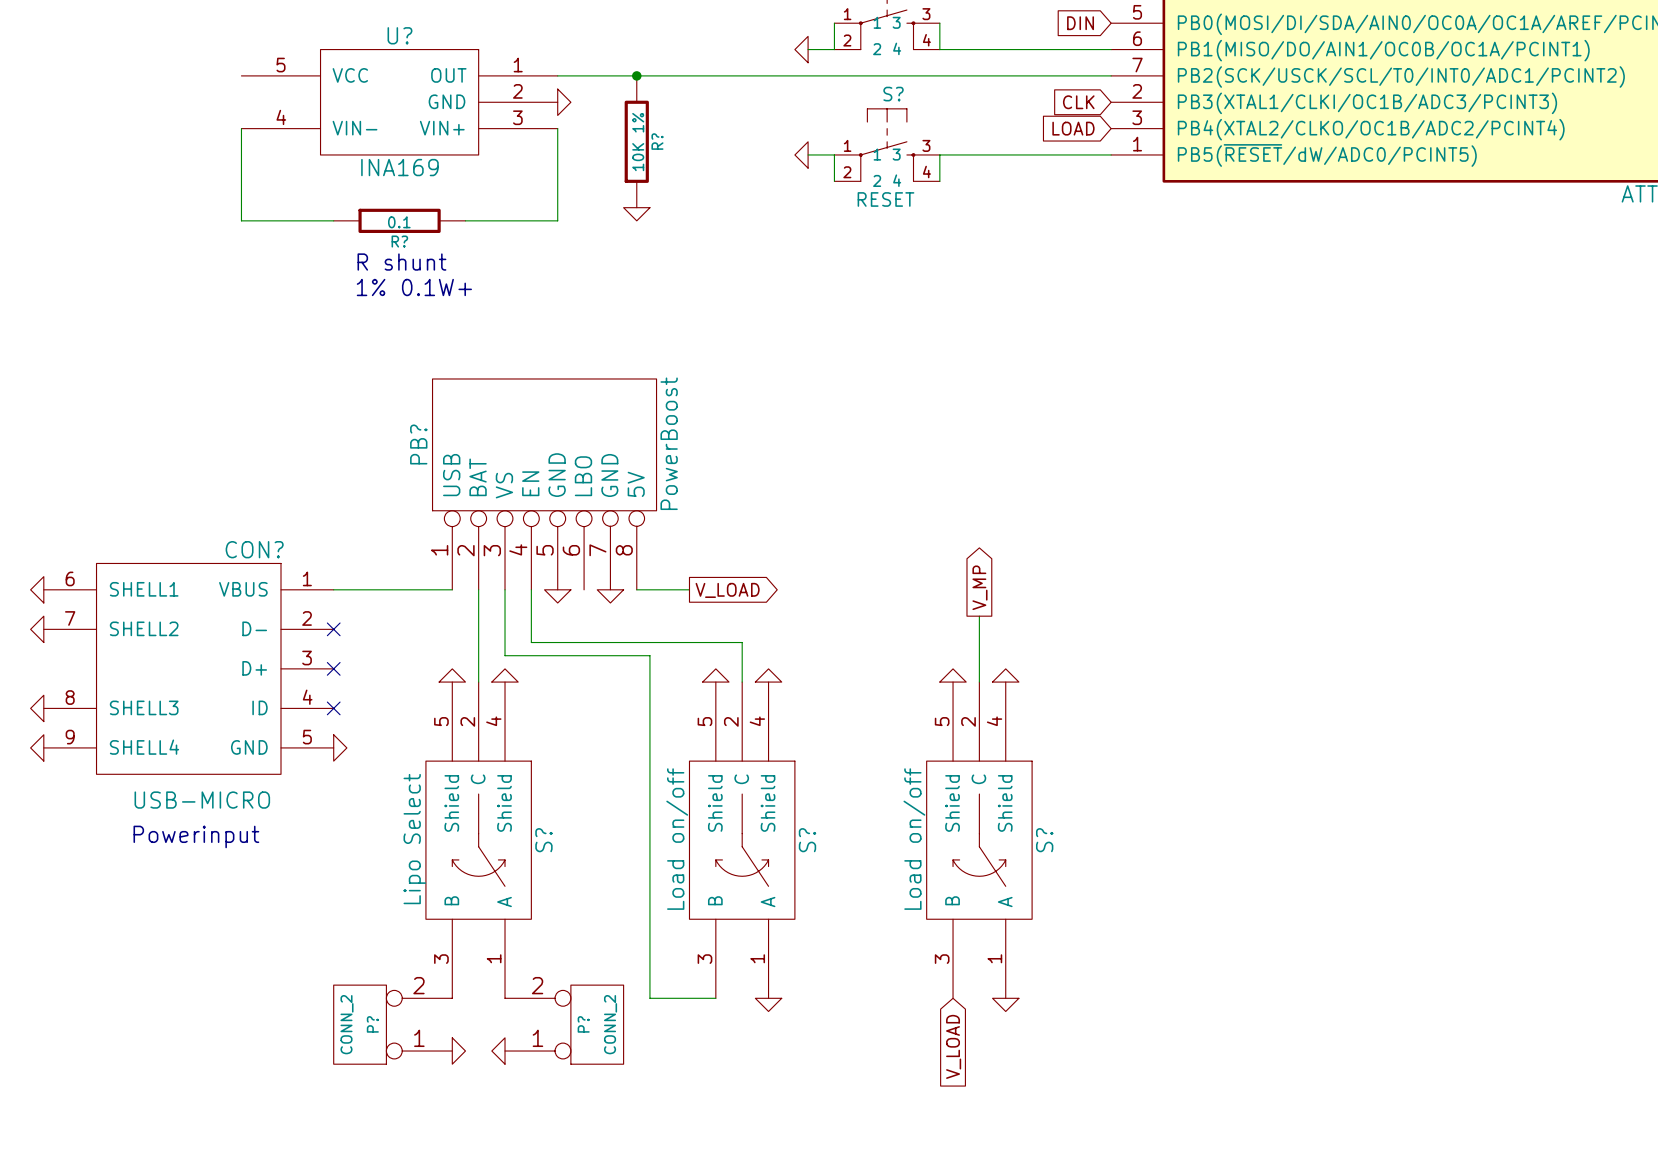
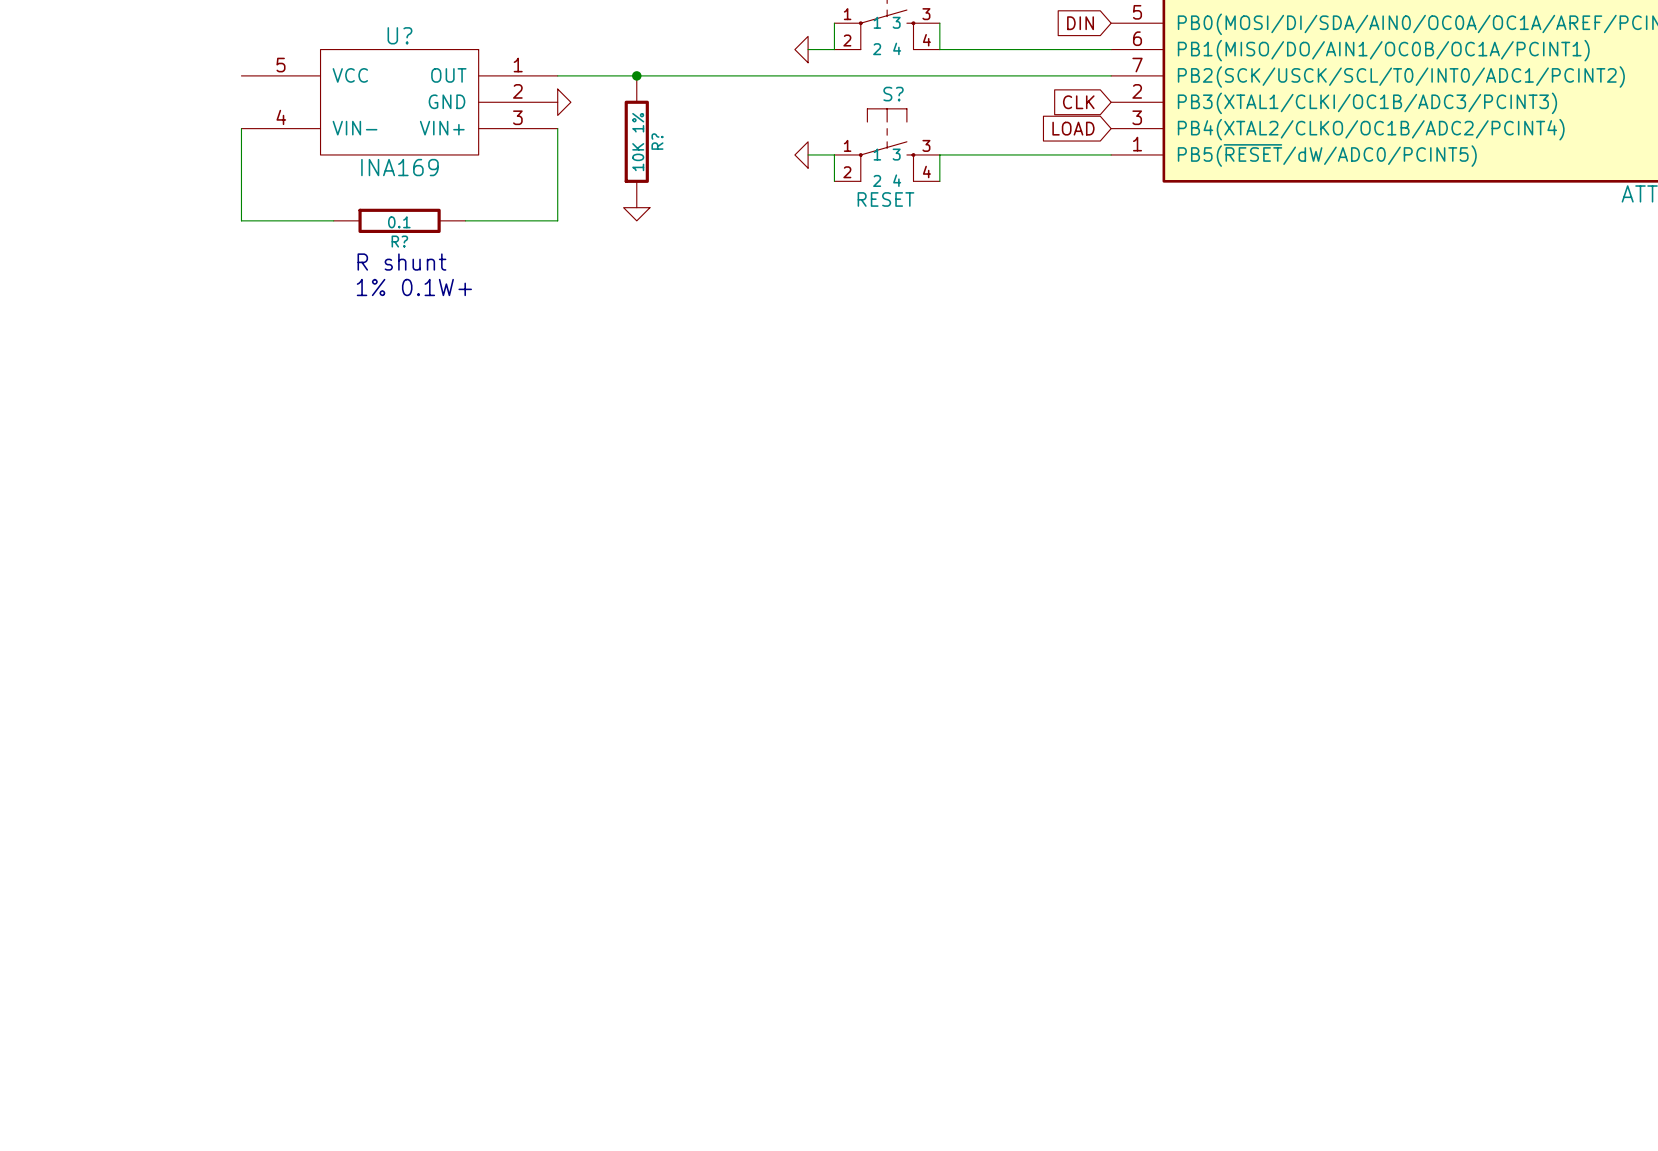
PB?: PowerBoost (544, 484) -> none
global label: V_MP (979, 587) -> none
power symbol: (37, 589) -> none
wire: (333, 589) (452, 589) -> none
wire: (478, 589) (478, 682) -> none
wire: (505, 589) (505, 655) (649, 655) (649, 998) (715, 998) -> none
wire: (531, 589) (531, 642) (742, 642) (742, 682) -> none
wire: (636, 589) (689, 589) -> none
global label: V_LOAD (727, 590) -> none
power symbol: (557, 596) -> none
power symbol: (610, 596) -> none
wire: (979, 616) (979, 682) -> none
power symbol: (37, 629) -> none
no-connect mark: (333, 629) -> none
CON?: USB-MICRO (188, 668) -> none
no-connect mark: (333, 668) -> none
power symbol: (452, 675) -> none
power symbol: (505, 675) -> none
power symbol: (715, 675) -> none
power symbol: (768, 675) -> none
power symbol: (953, 675) -> none
power symbol: (1005, 675) -> none
power symbol: (37, 708) -> none
no-connect mark: (333, 708) -> none
power symbol: (37, 747) -> none
power symbol: (340, 747) -> none
text: Powerinput (196, 836) -> none
S?: Lipo Select (478, 840) -> none
S?: Load on/off (742, 840) -> none
S?: Load on/off (979, 840) -> none
power symbol: (768, 1004) -> none
power symbol: (1005, 1004) -> none
P?: CONN_2 (393, 1024) -> none
P?: CONN_2 (564, 1024) -> none
global label: V_LOAD (953, 1046) -> none
power symbol: (458, 1051) -> none
power symbol: (498, 1051) -> none

